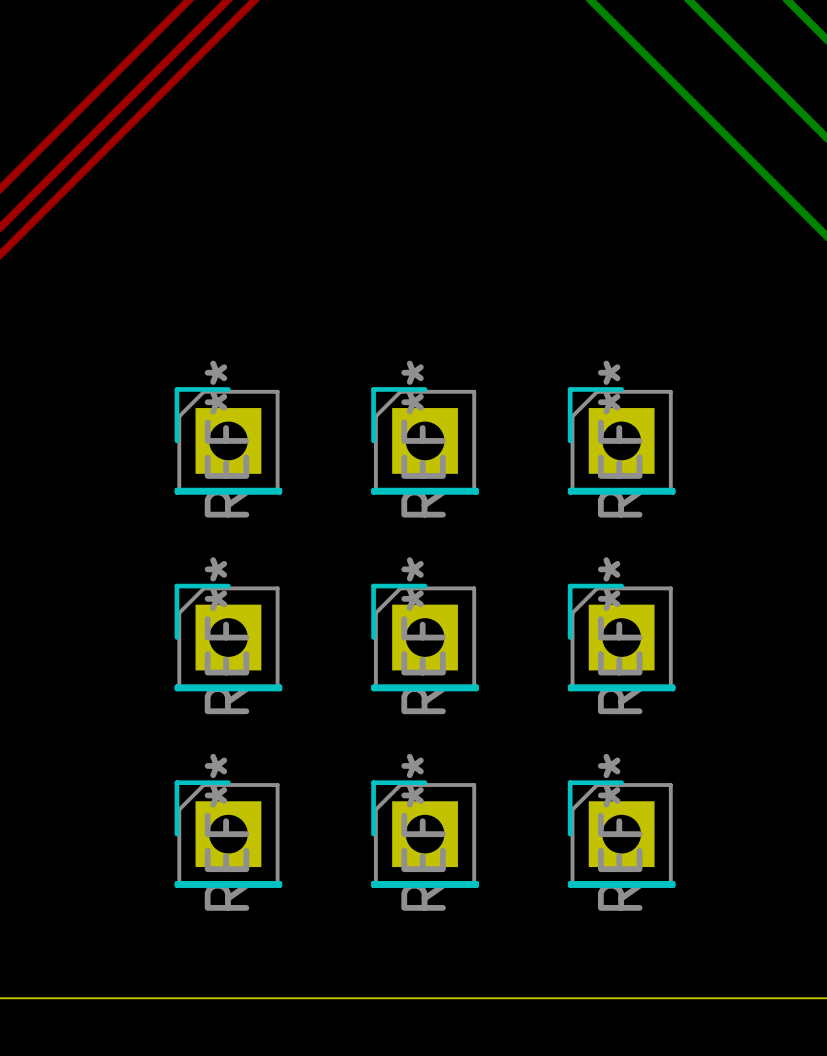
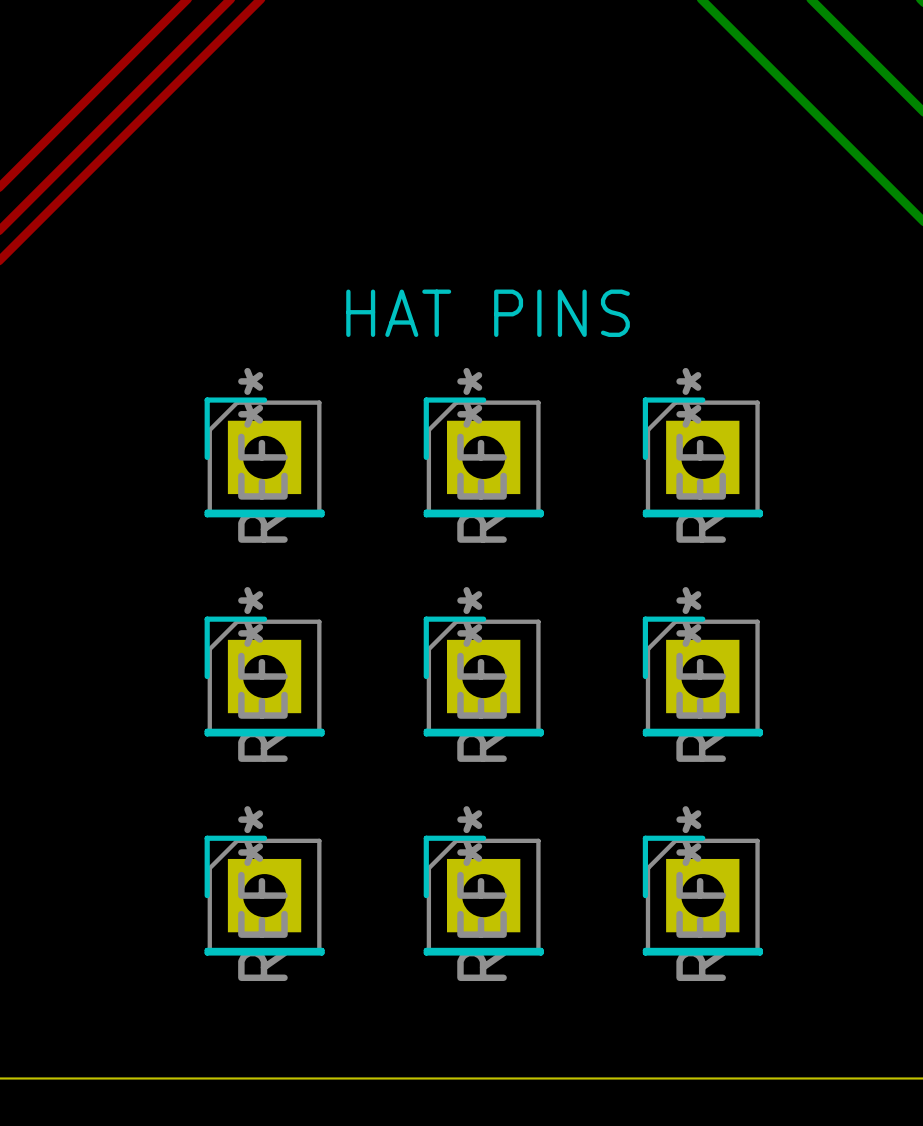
text: none -> HAT PINS (488, 313)

